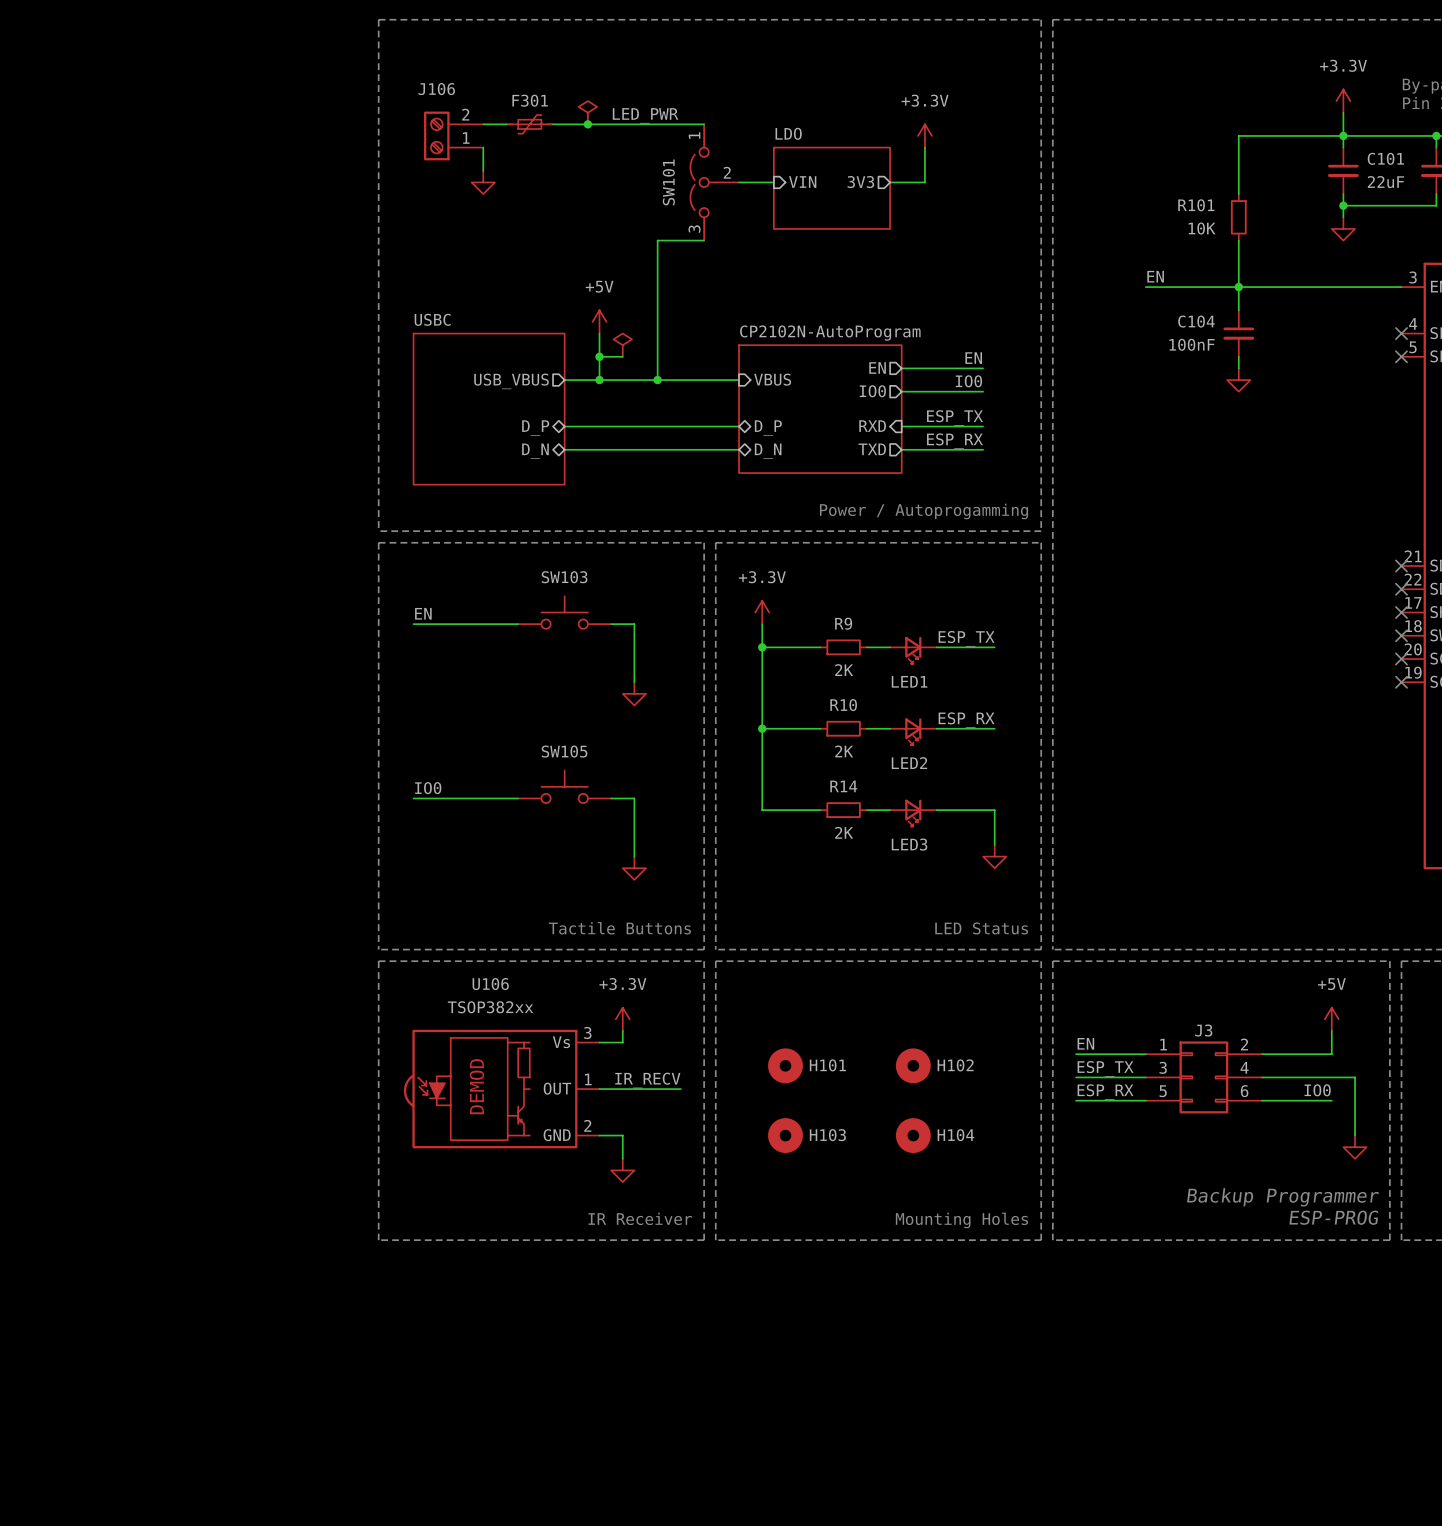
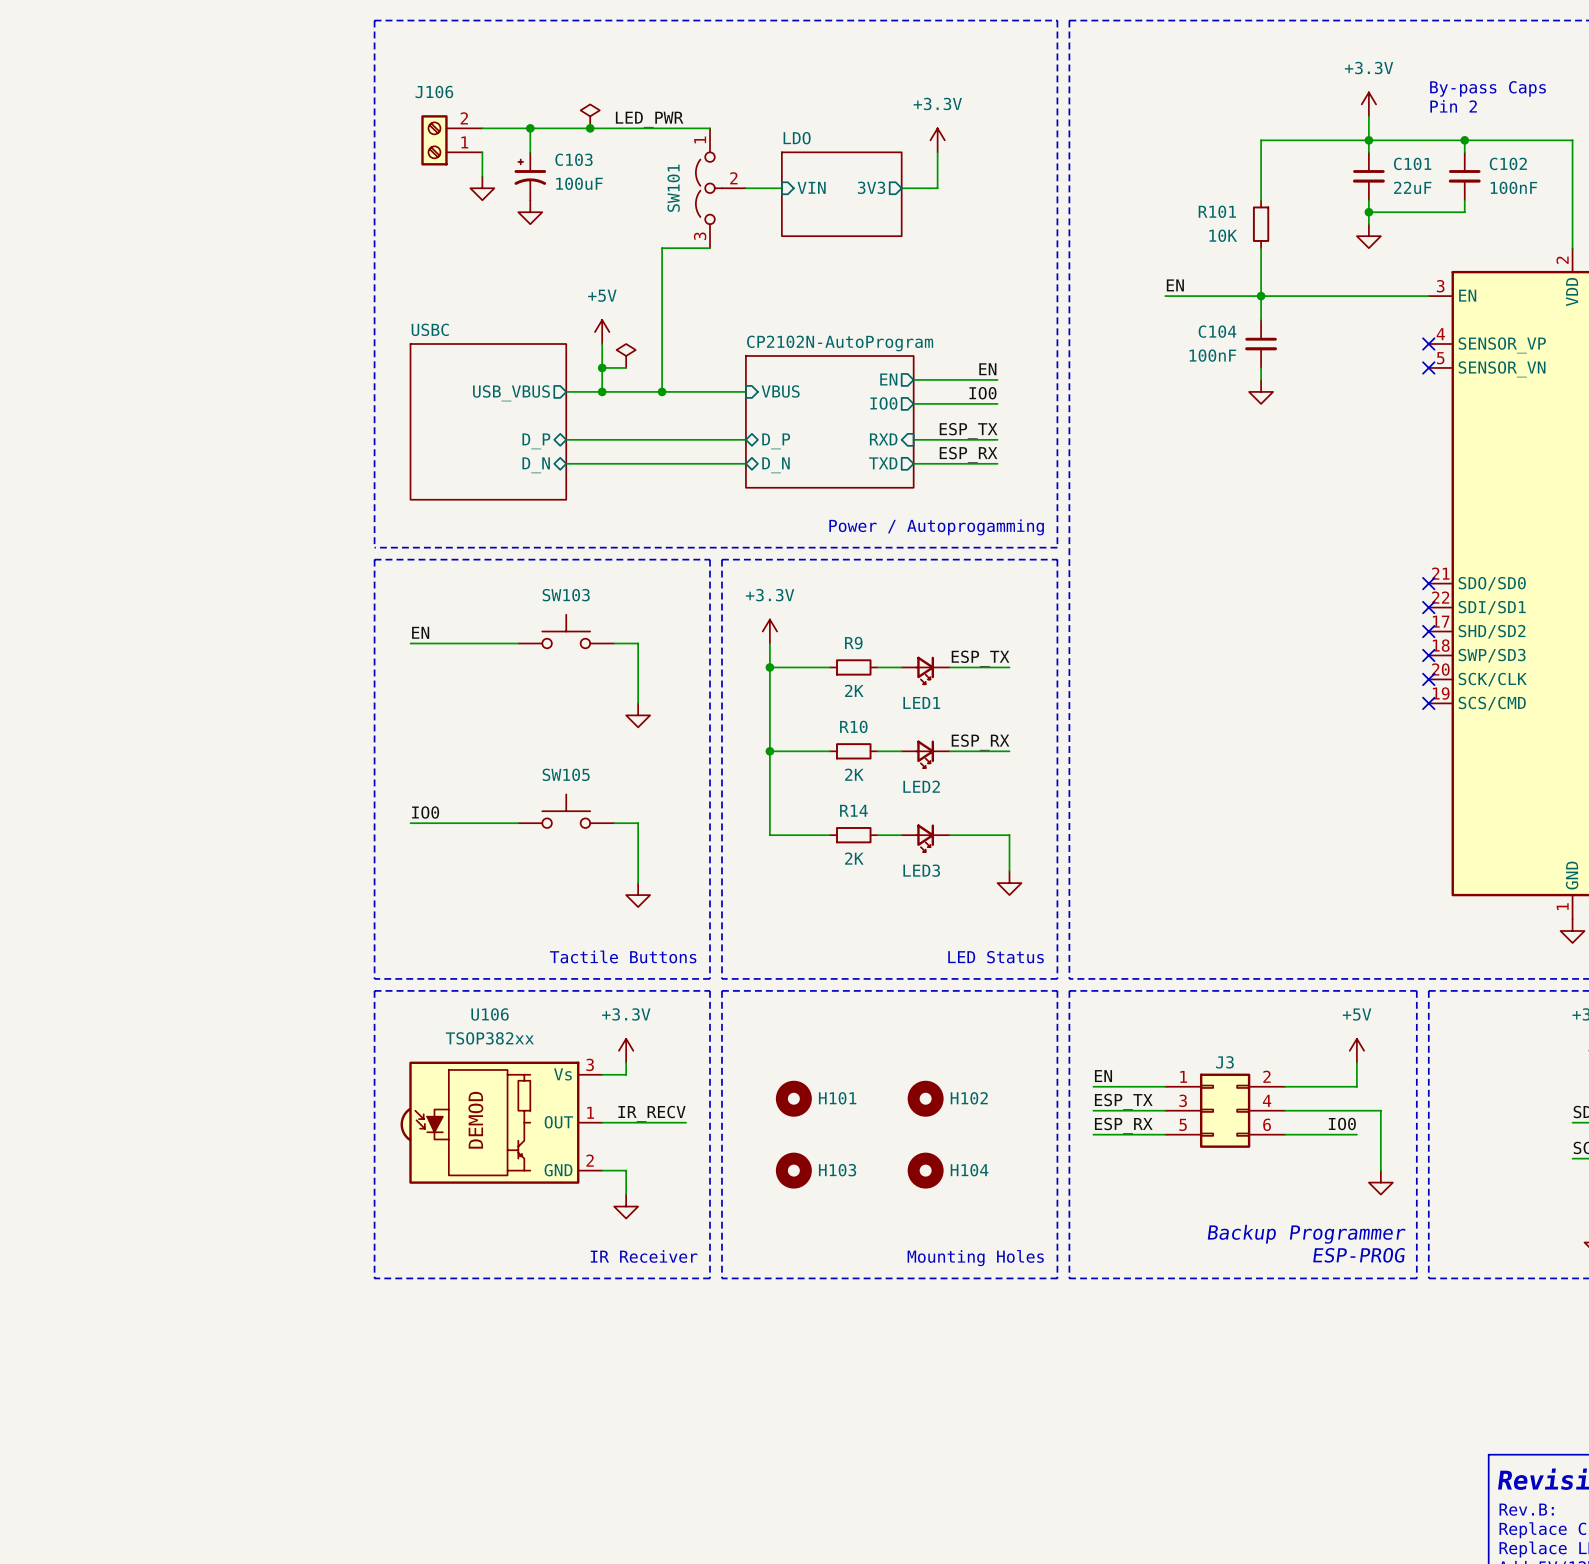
wire: none -> (530, 128) (530, 152)
F301: (529, 124) -> none
junction: none -> (530, 128)
C103: none -> 100uF (530, 176)
power symbol: none -> (530, 212)

